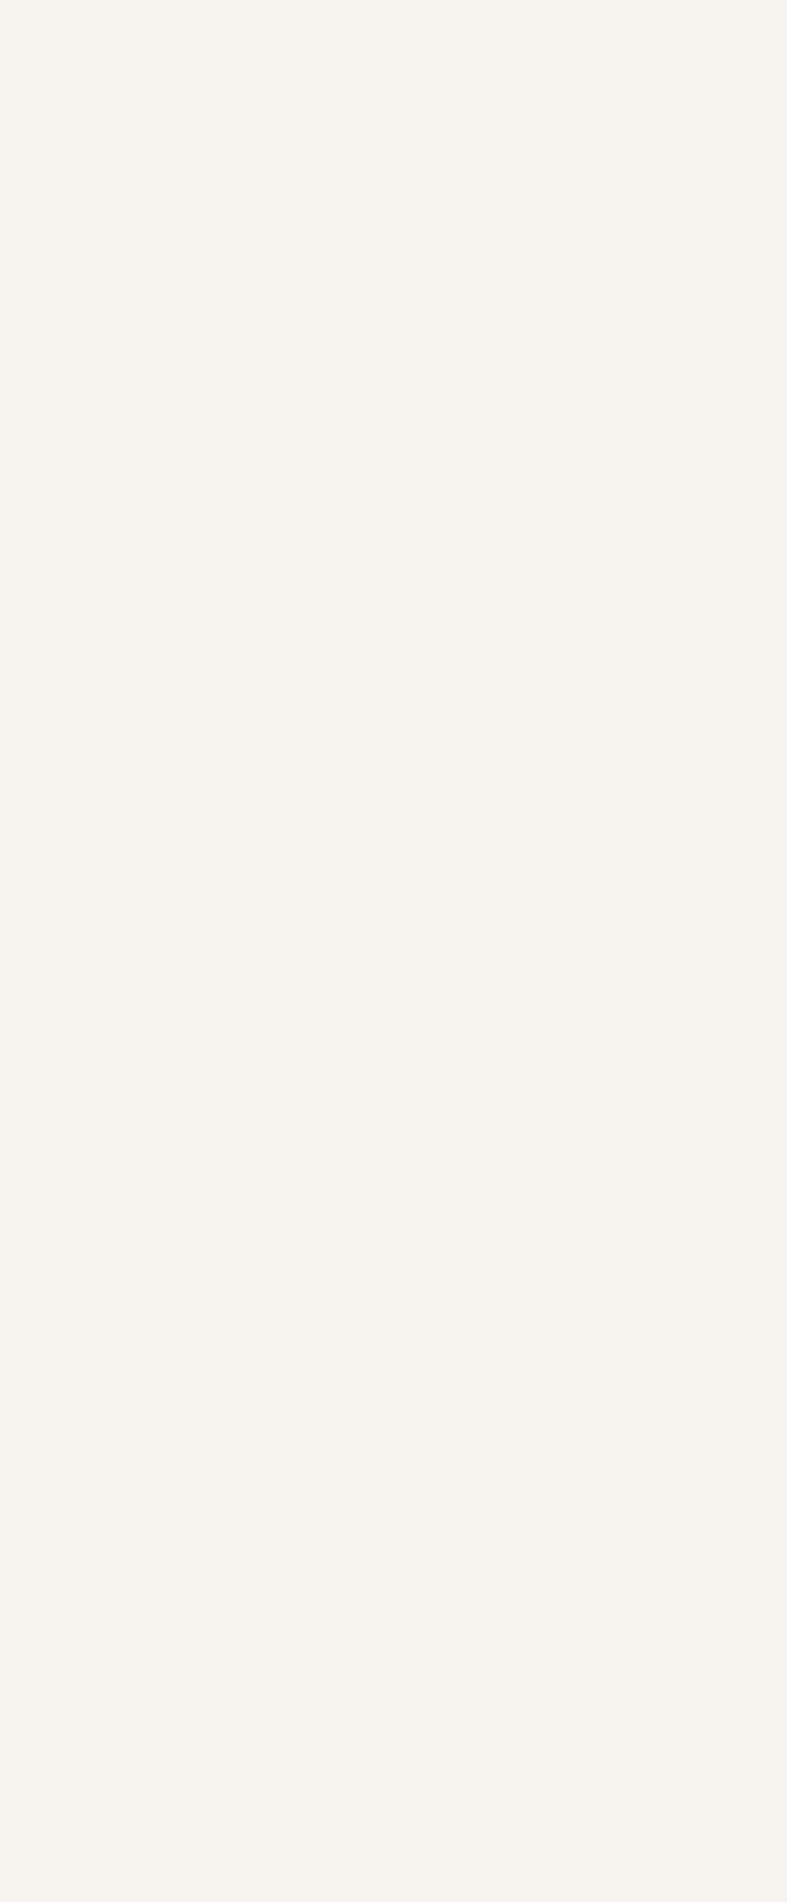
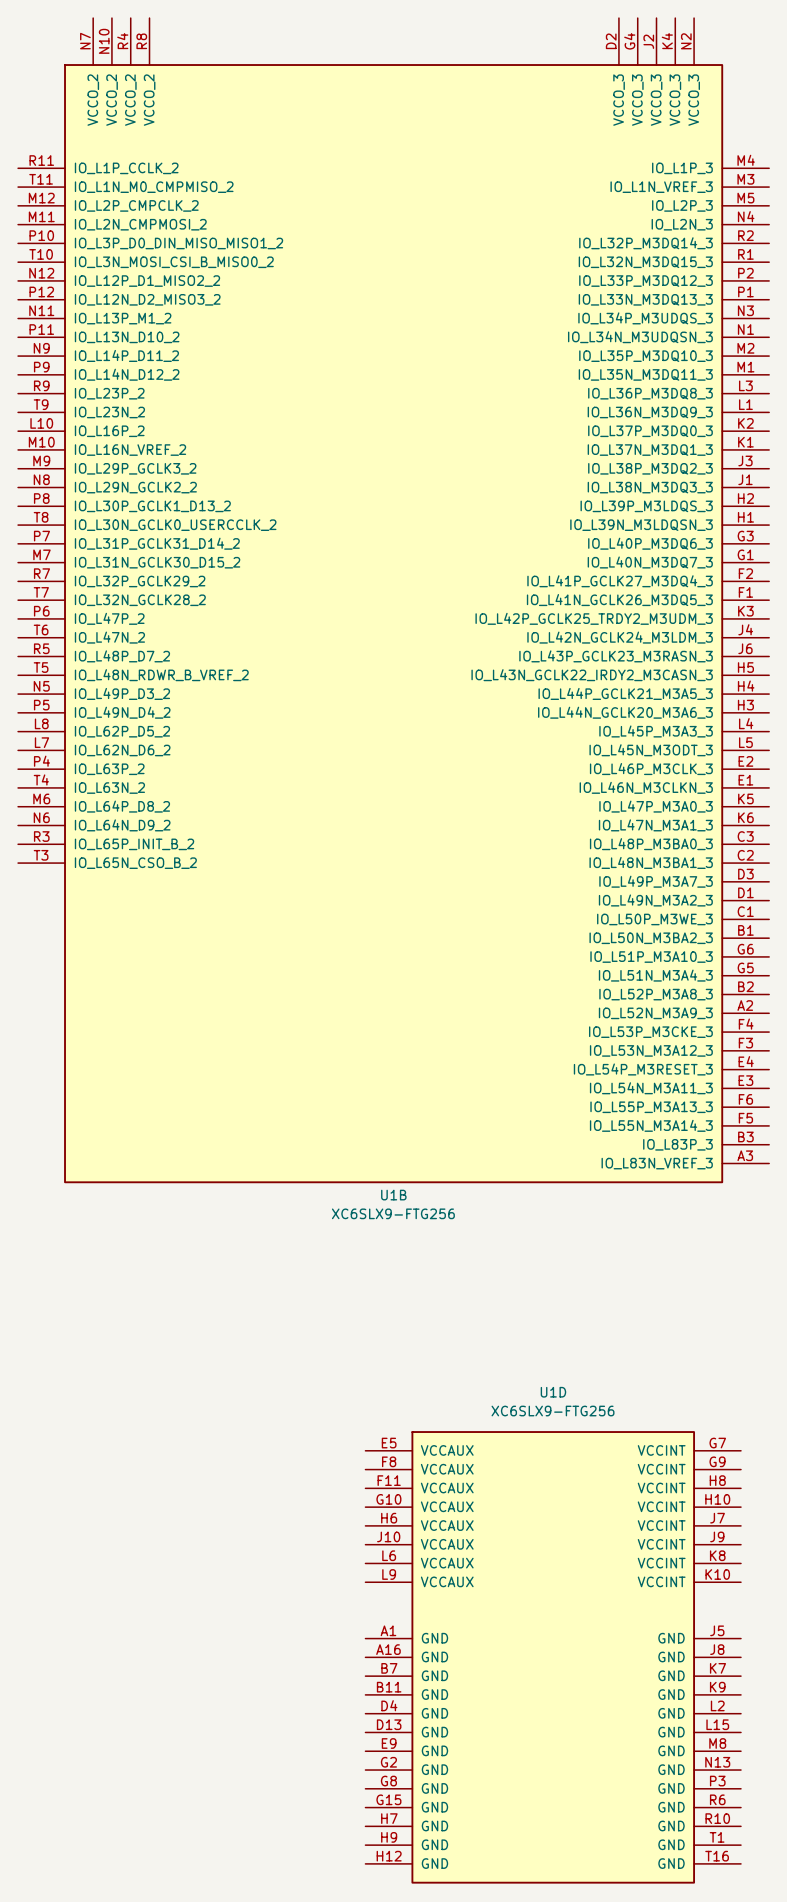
U1B: none -> XC6SLX9-FTG256 (393, 600)
U1D: none -> XC6SLX9-FTG256 (553, 1657)

